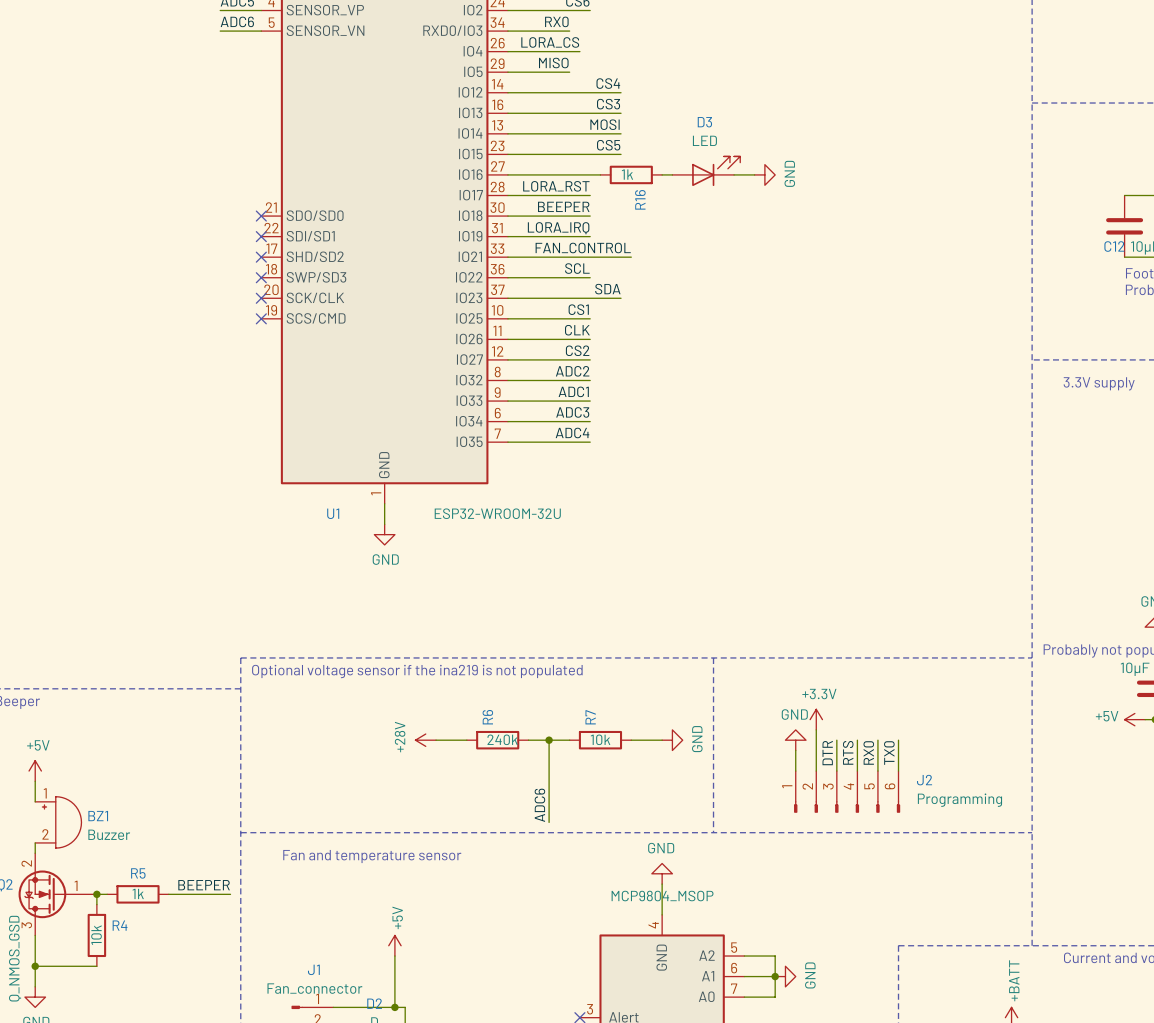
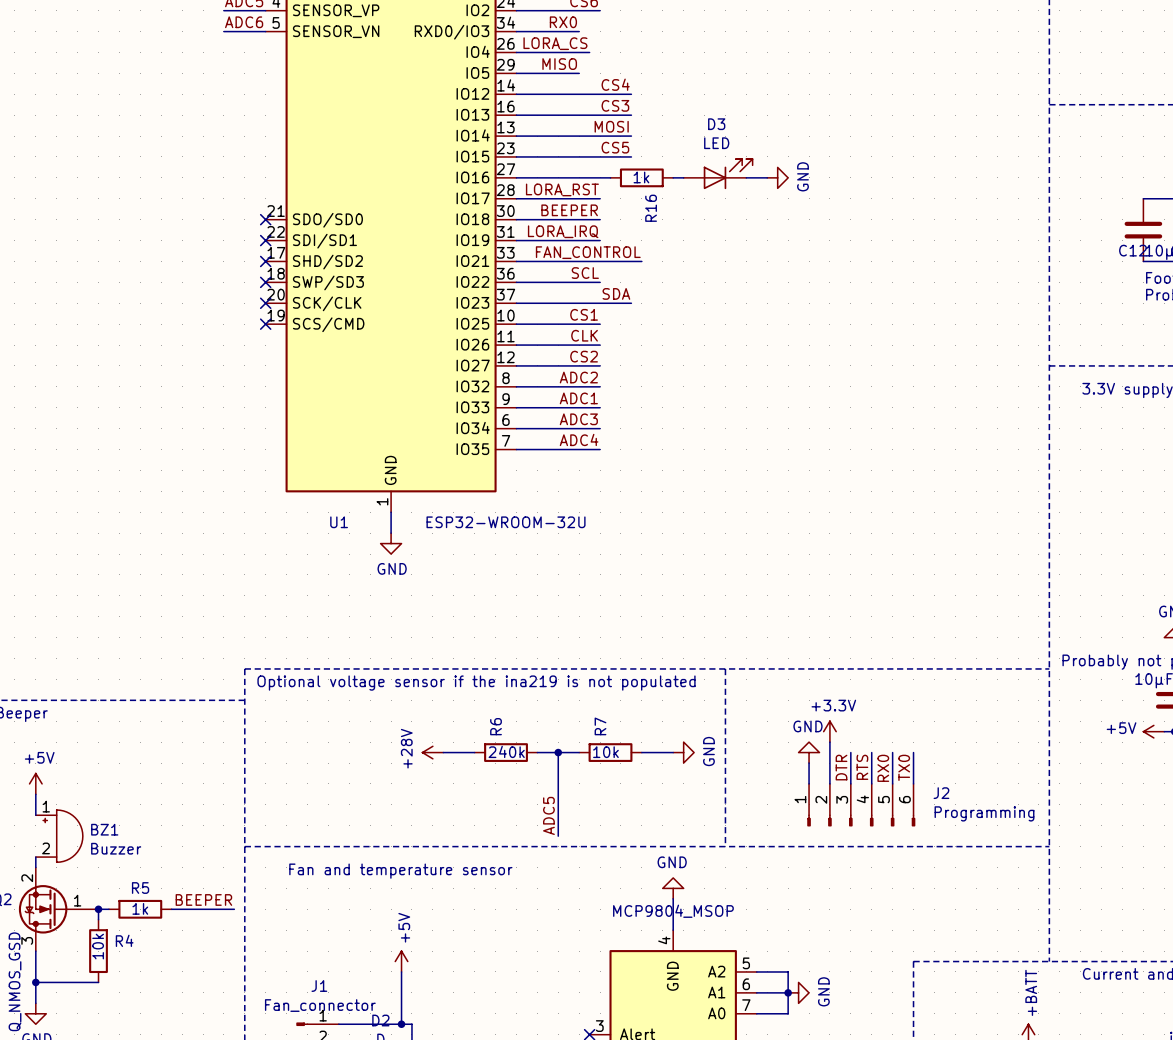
label: ADC6 (539, 805) -> ADC5 (548, 815)

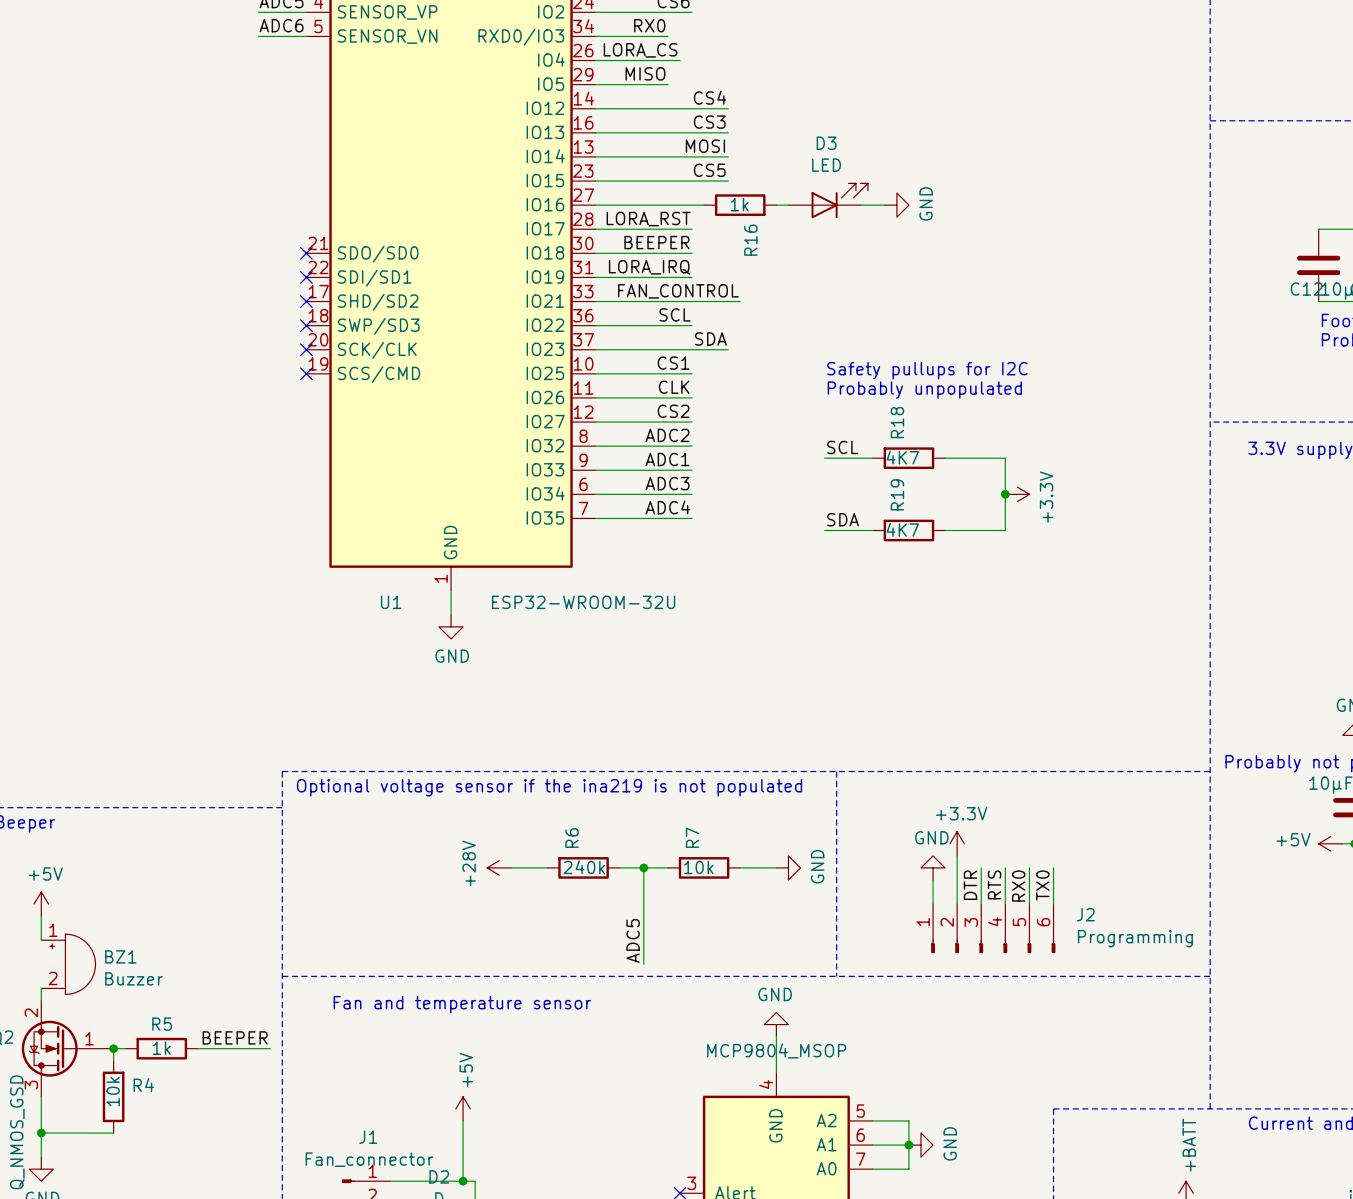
text: none -> Safety pullups for I2C (927, 370)
text: none -> Probably unpopulated (924, 390)
label: none -> SCL (842, 447)
wire: none -> (824, 458) (872, 458)
R18: none -> 4K7 (908, 458)
wire: none -> (945, 458) (1005, 458) (1005, 530) (945, 530)
junction: none -> (1005, 494)
power symbol: none -> +3.3V (1017, 494)
label: none -> SDA (843, 519)
wire: none -> (824, 530) (872, 530)
R19: none -> 4K7 (908, 530)

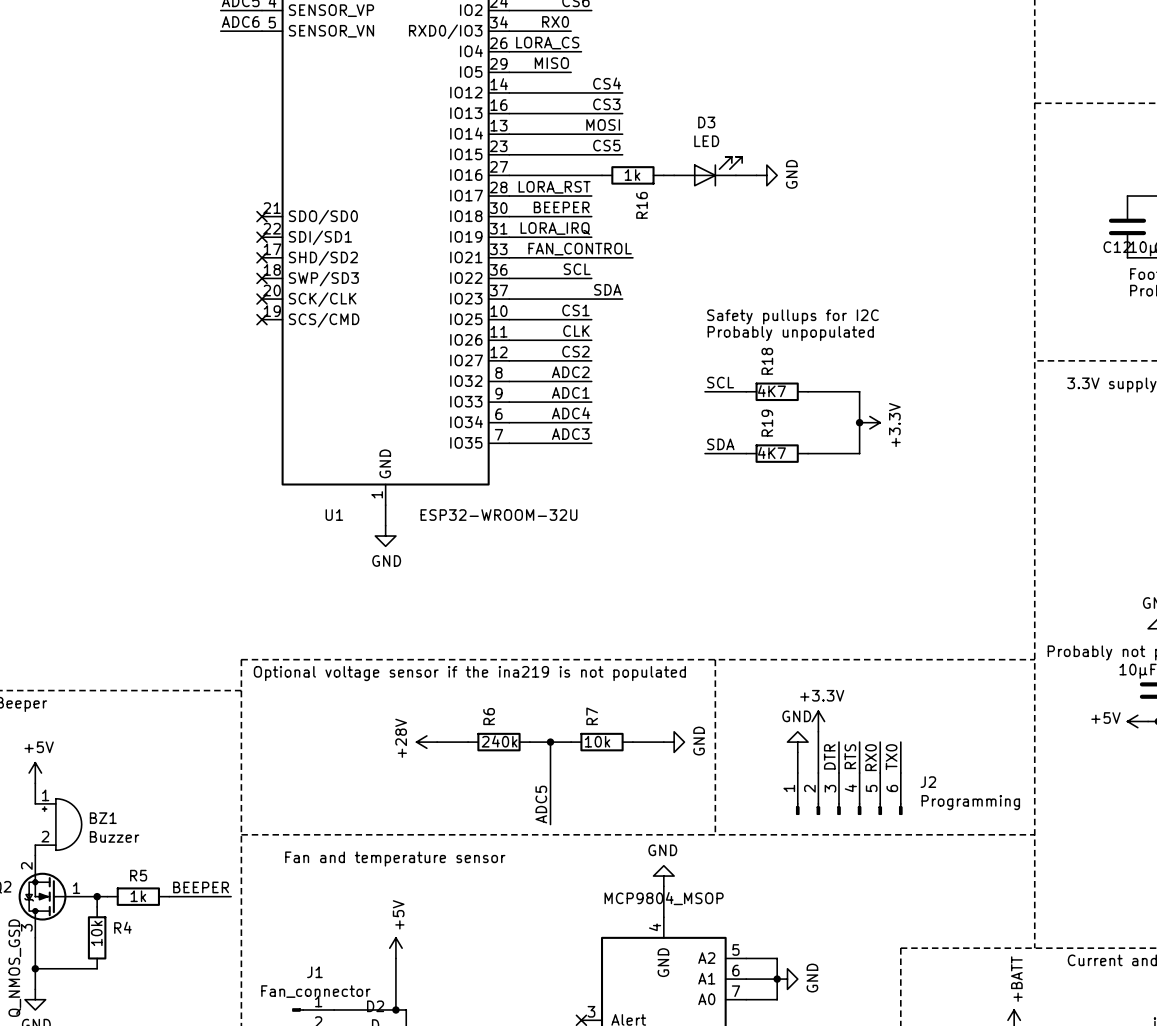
label: ADC3 (667, 483) -> ADC4 (571, 413)
label: ADC4 (667, 507) -> ADC3 (570, 434)

